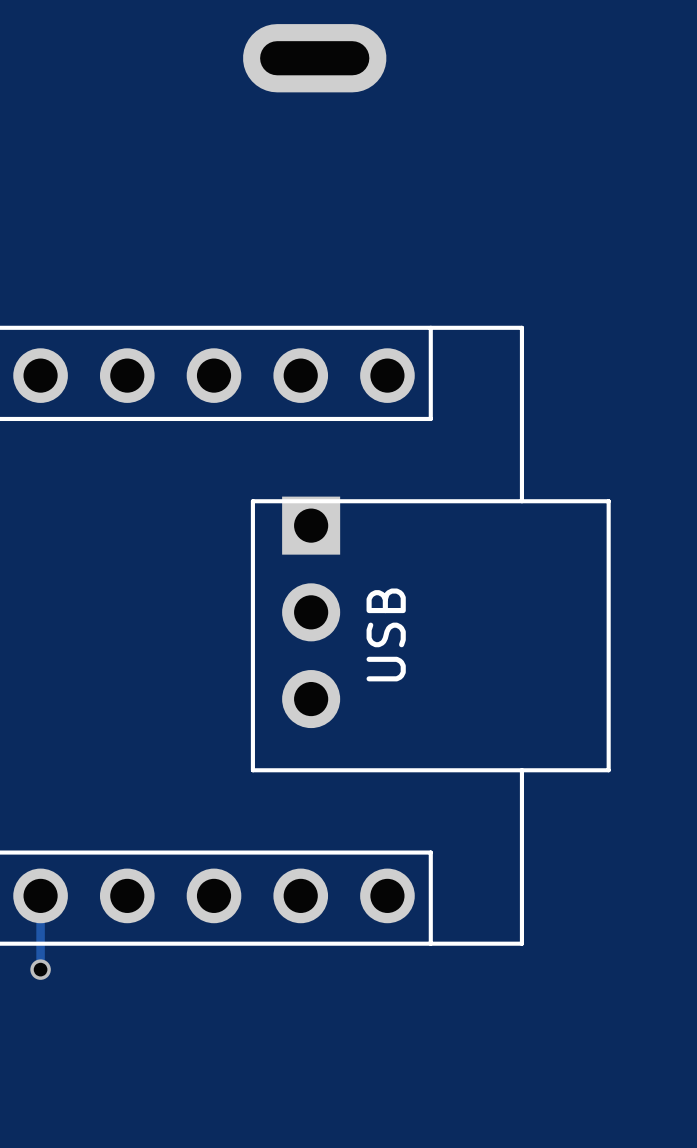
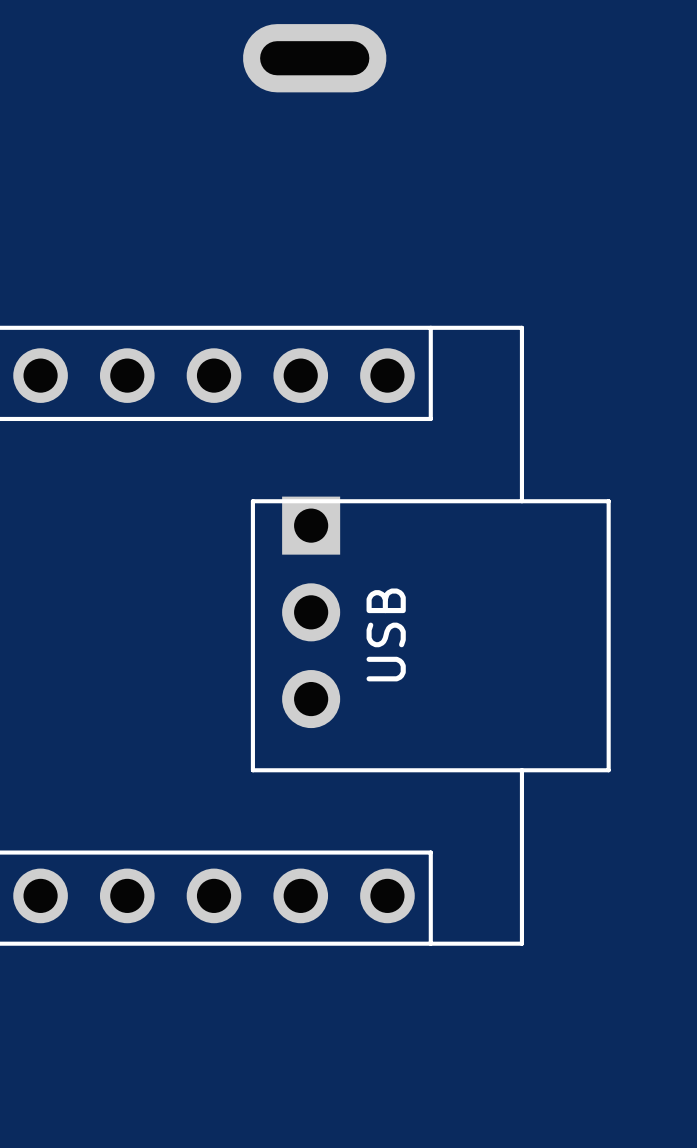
track: (40, 895) (40, 969) -> none
via: (40, 969) -> none

